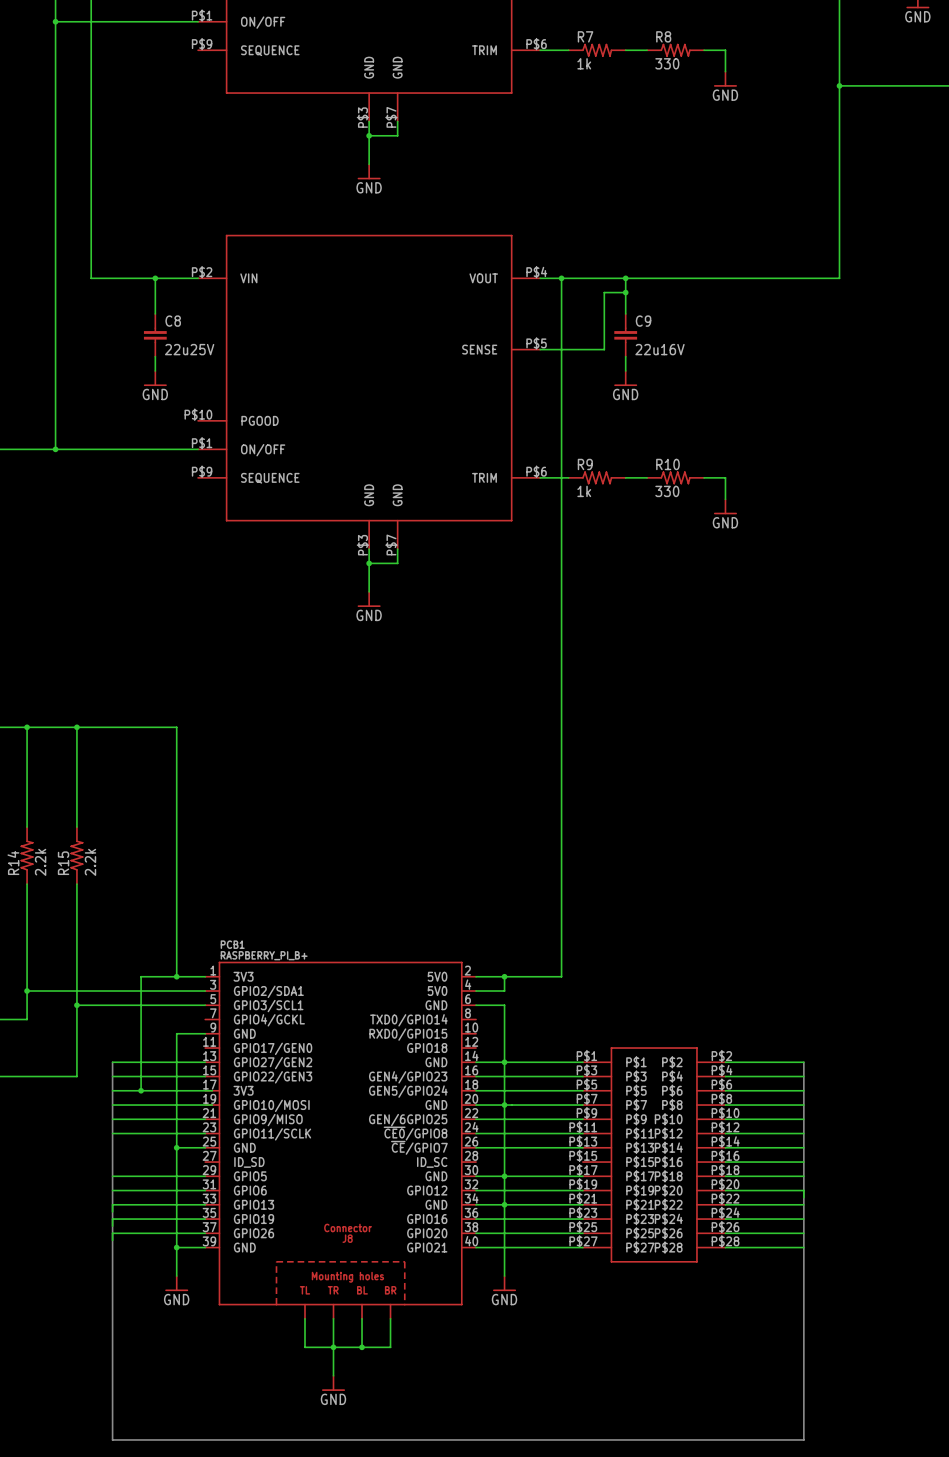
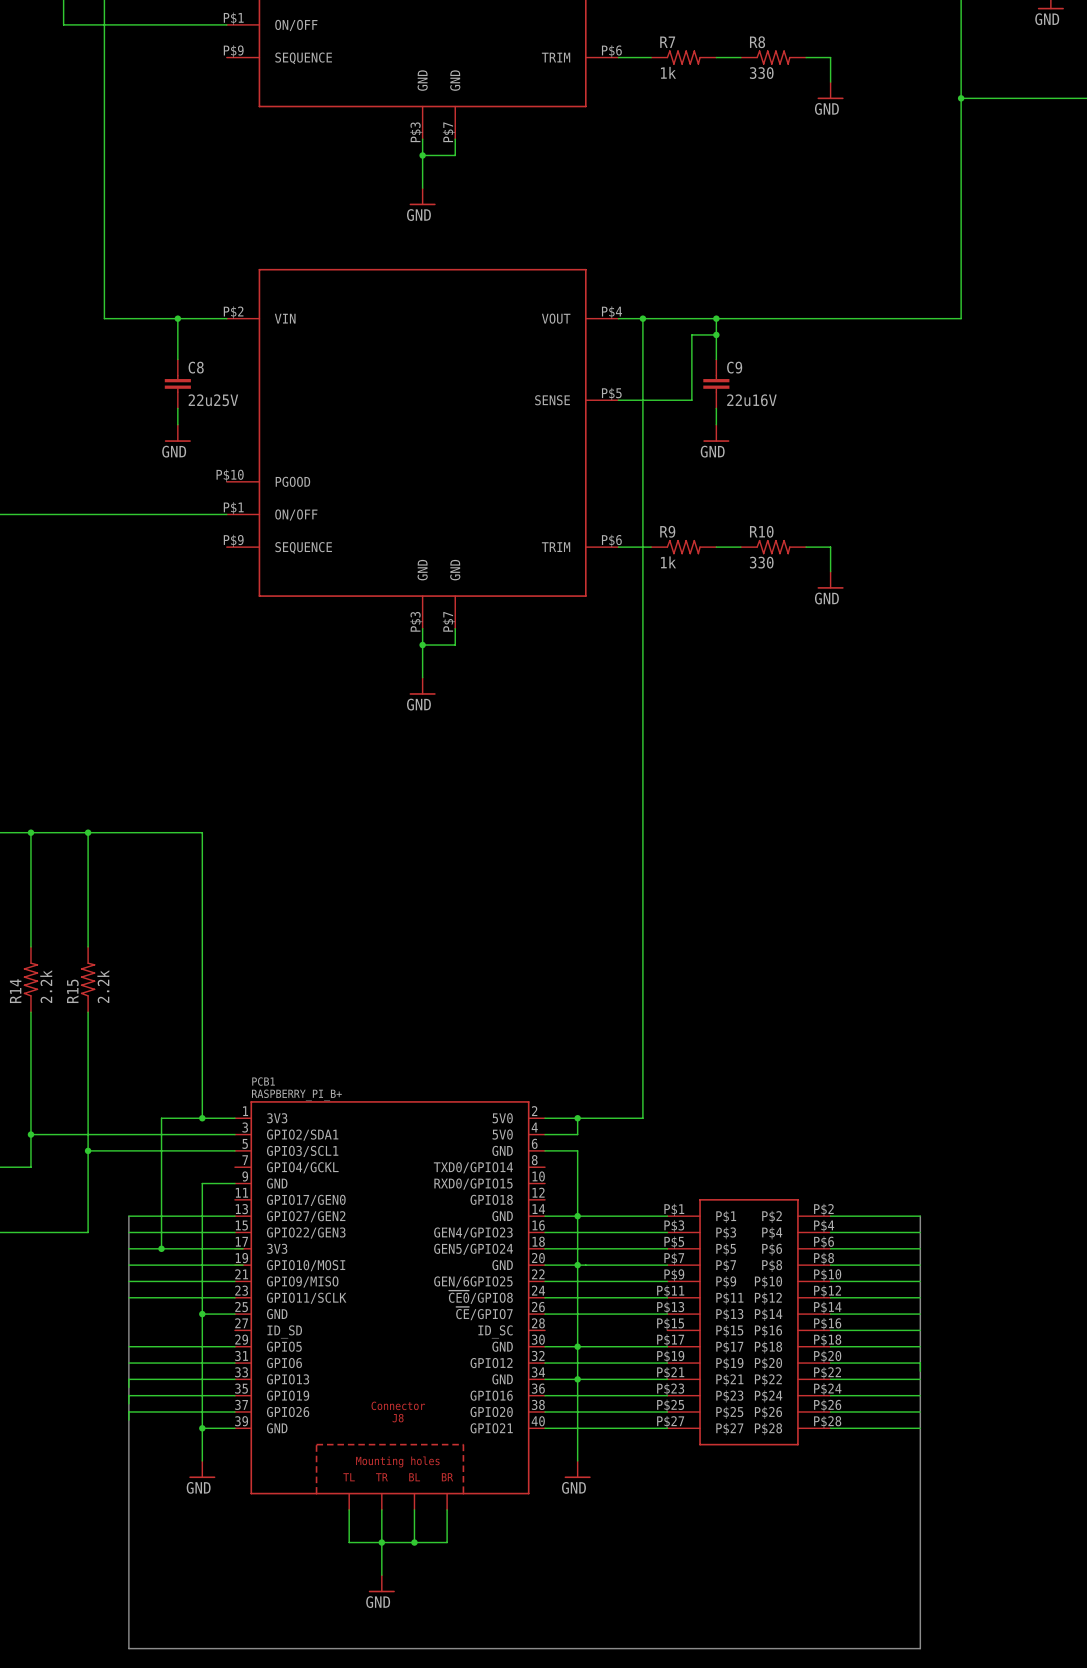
wire: (55, 21) (55, 449) -> none
junction: (55, 21) -> none
junction: (55, 449) -> none

